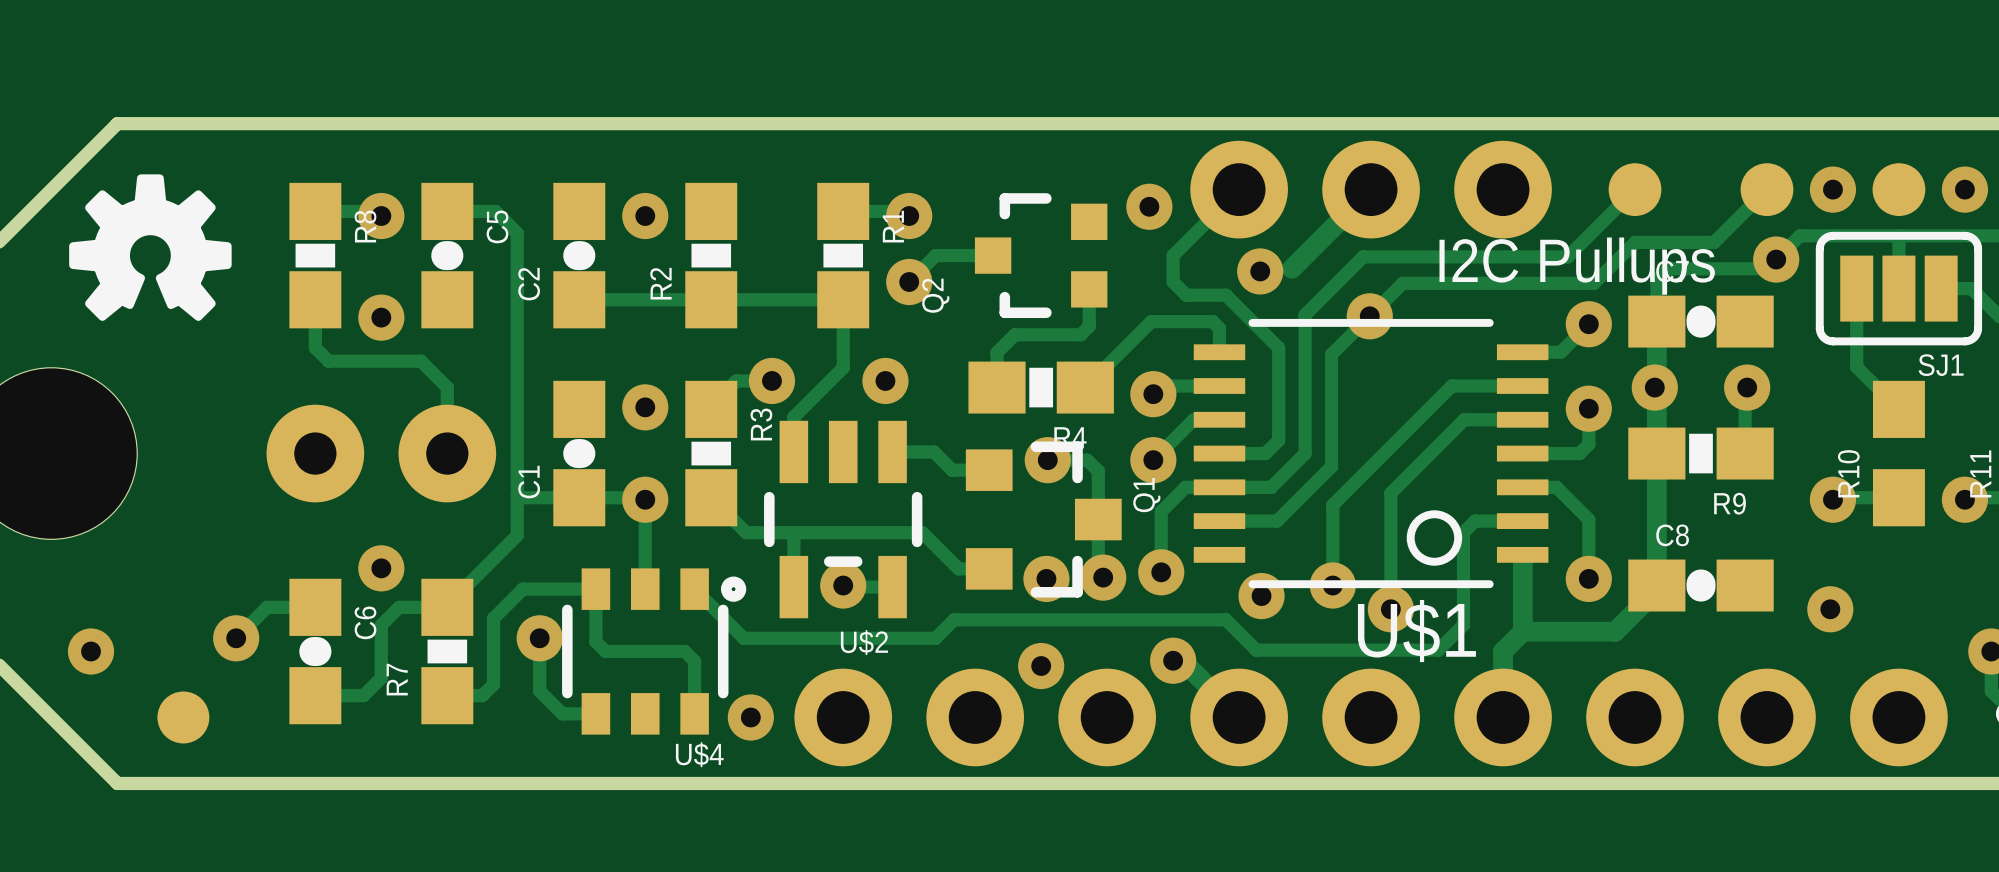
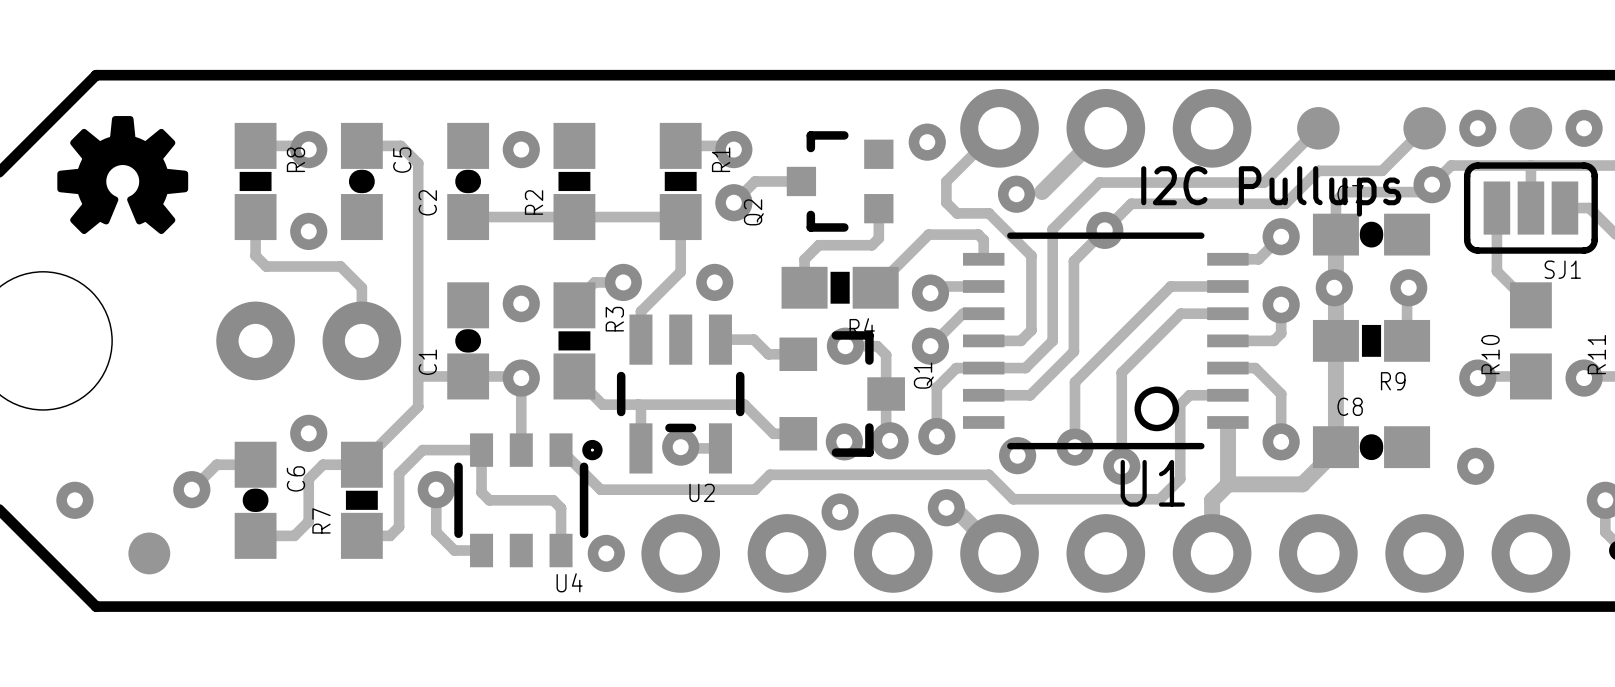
U$1 name: U$1 (1416, 631) -> U1 (1152, 483)
U$2 name: U$2 (864, 642) -> U2 (702, 492)
U$4 name: U$4 (699, 754) -> U4 (569, 582)

